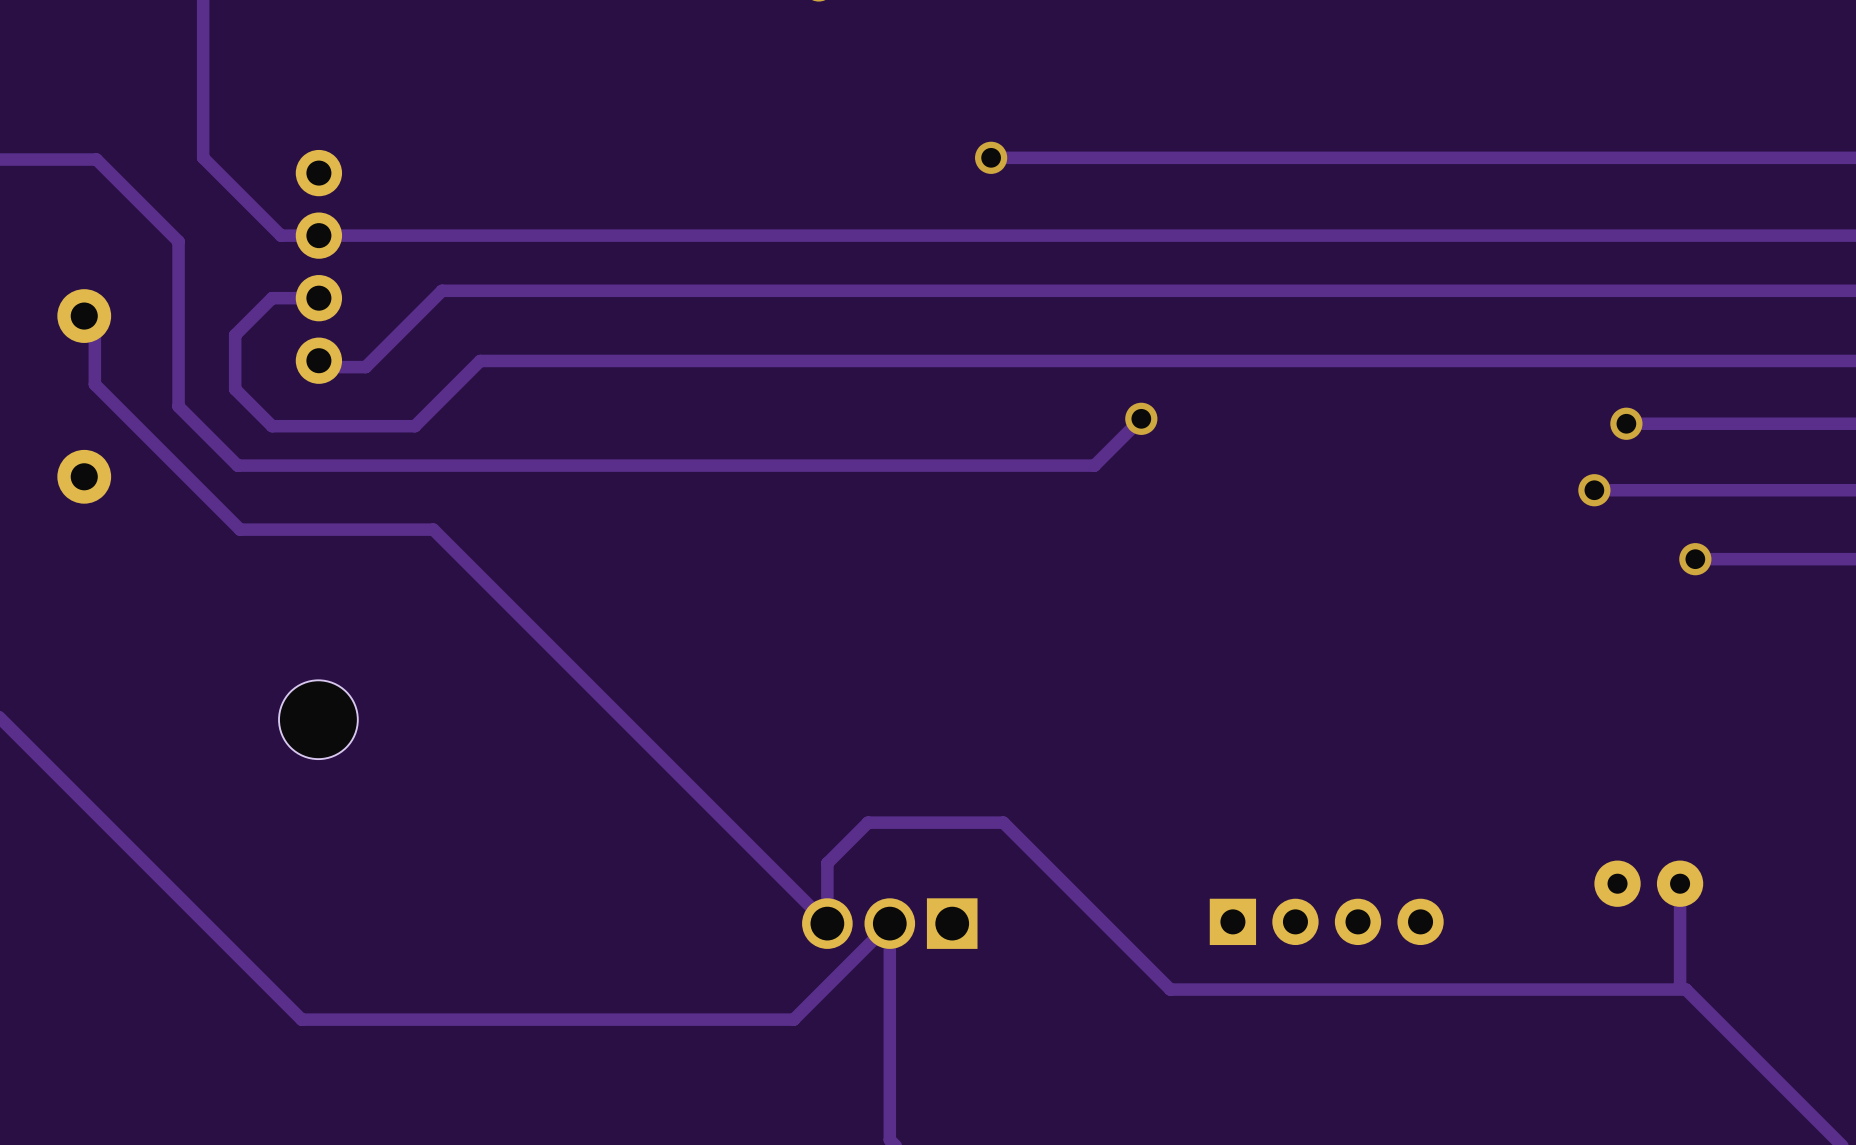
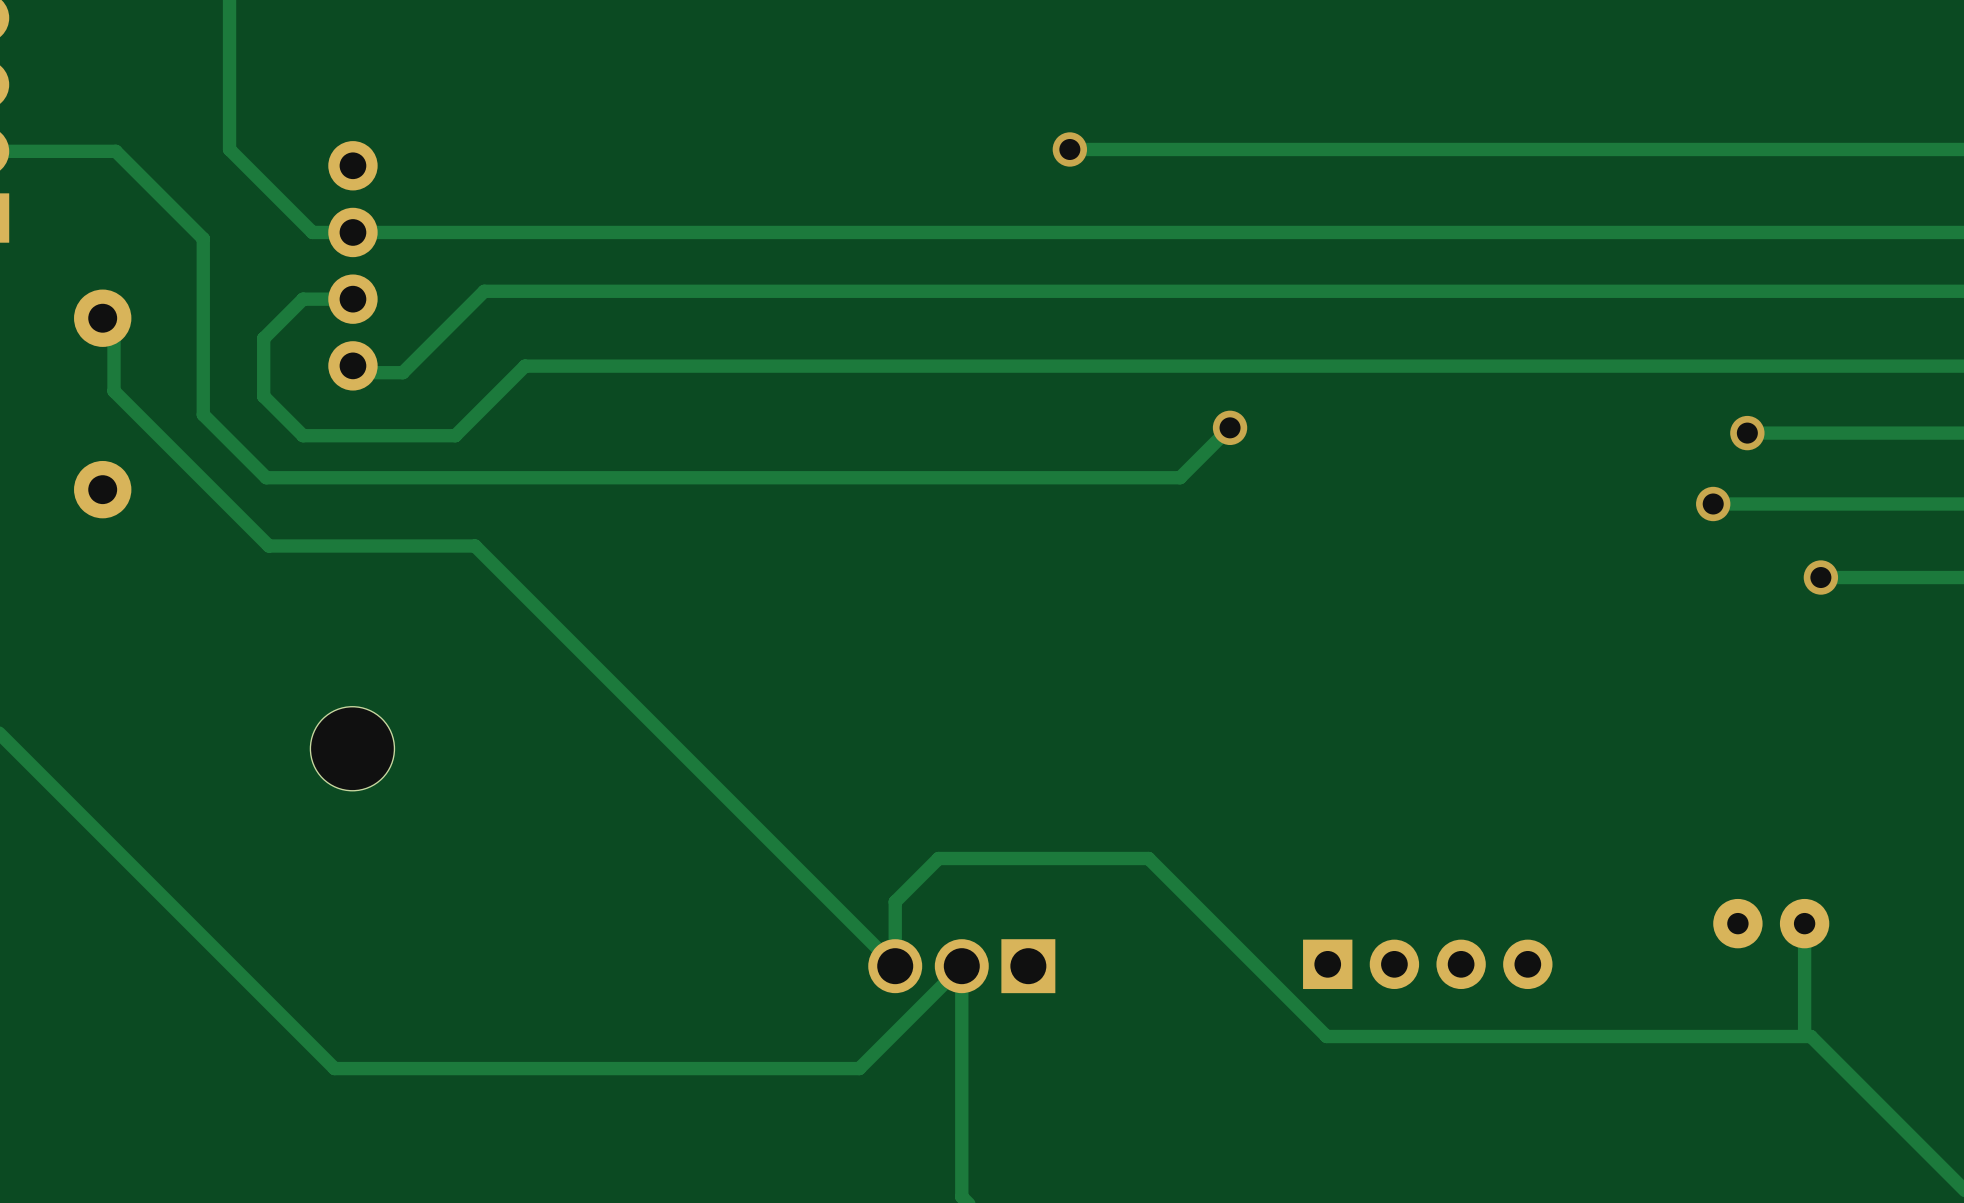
track: (1003, 822) (1170, 989) (1231, 989) -> (1082, 858) (1148, 858) (1326, 1036)

